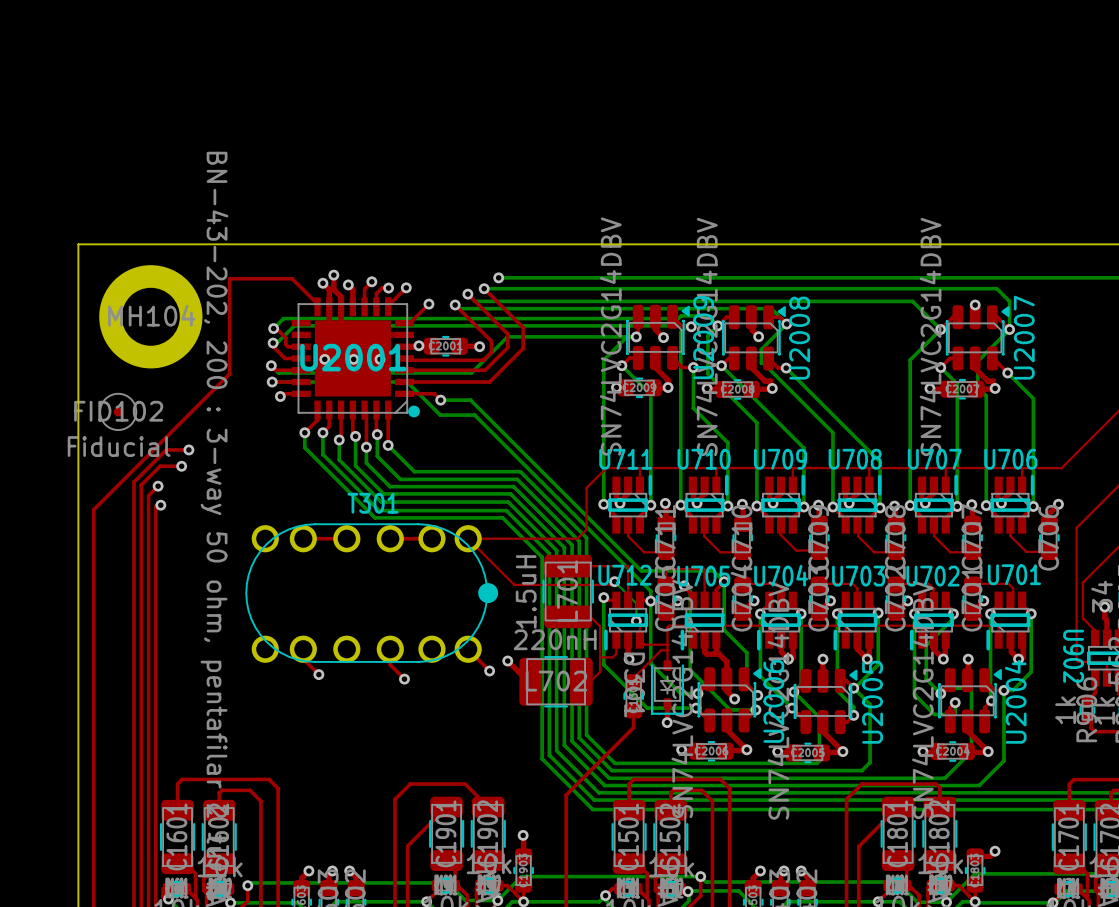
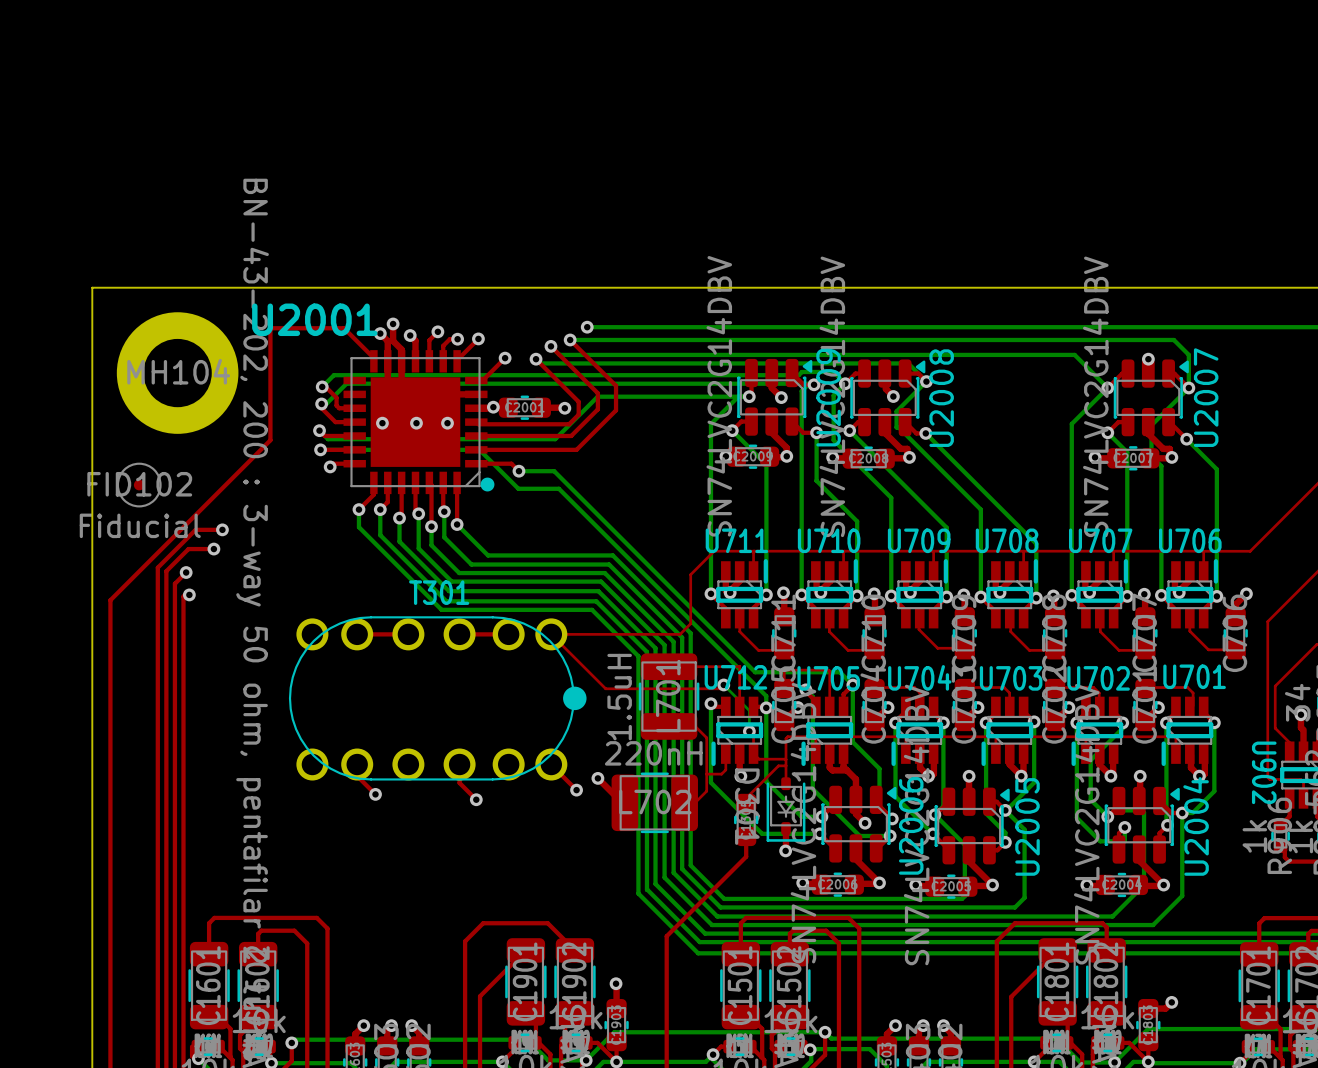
U2001 name position: U2001 (353, 357) -> U2001 (314, 319)

